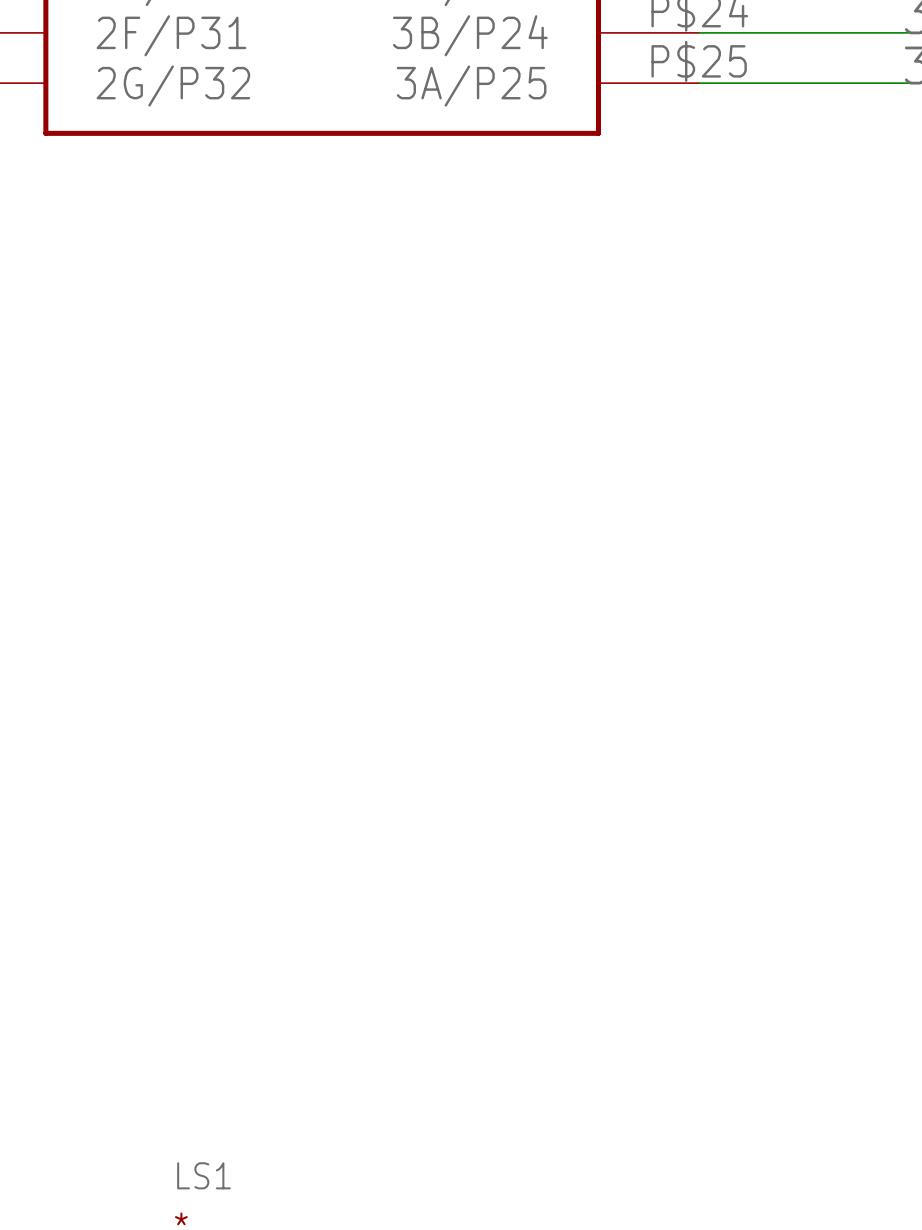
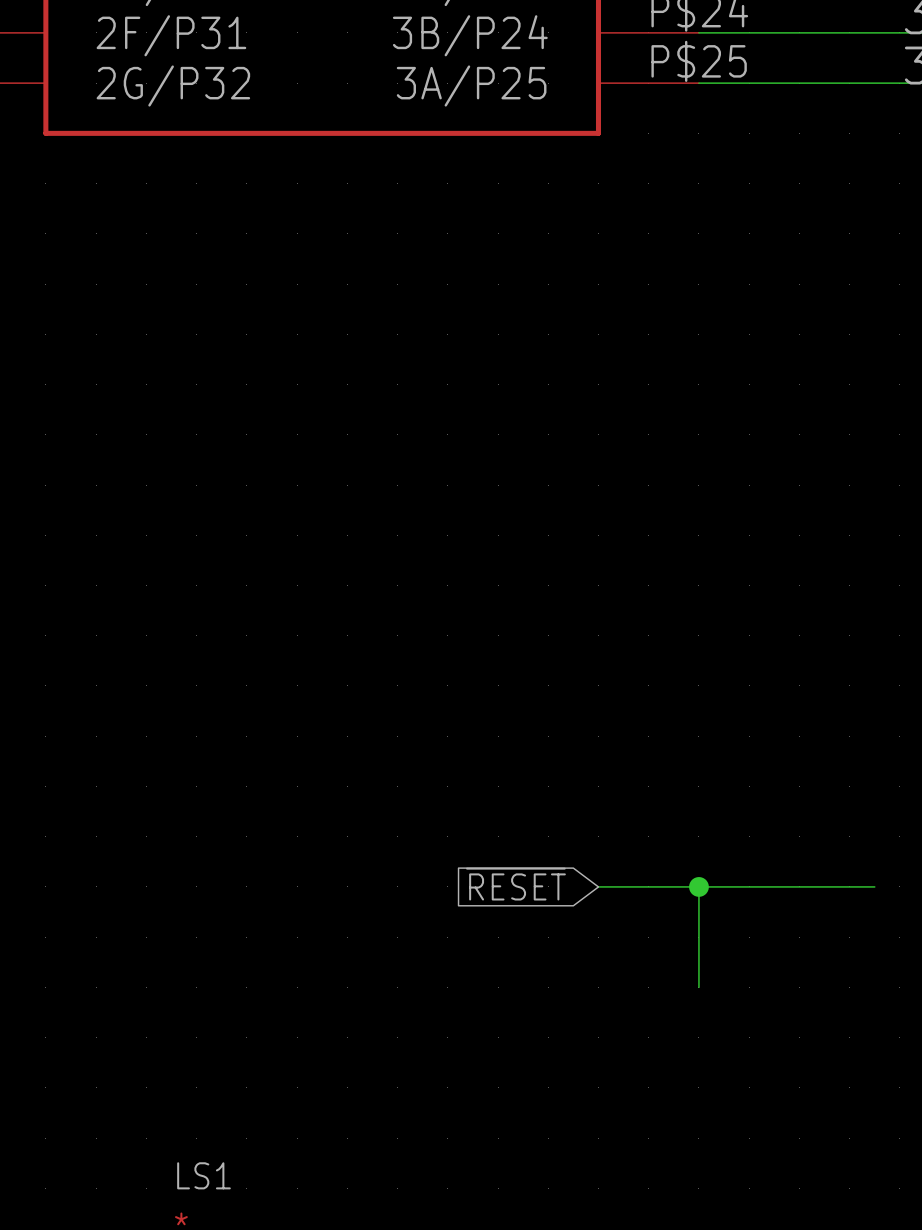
global label: none -> ~{RESET} (515, 884)
wire: none -> (598, 886) (874, 886)
wire: none -> (698, 886) (698, 987)
junction: none -> (698, 886)

